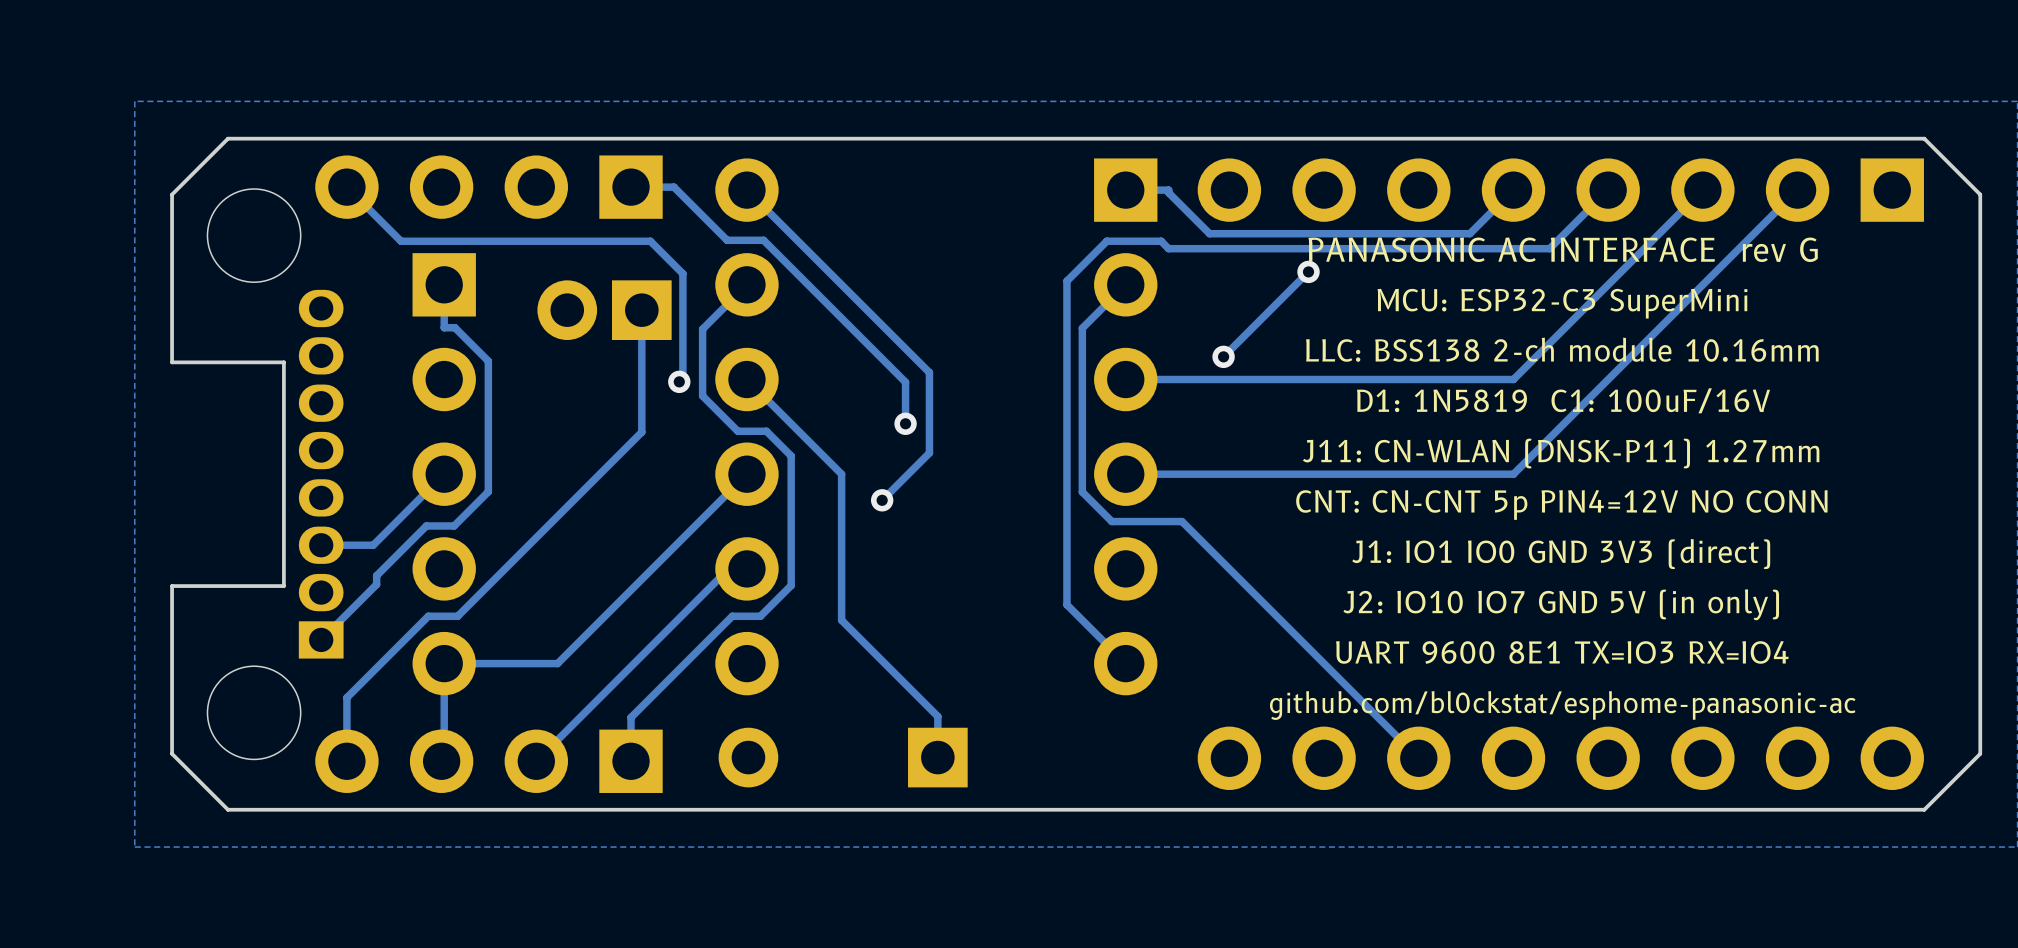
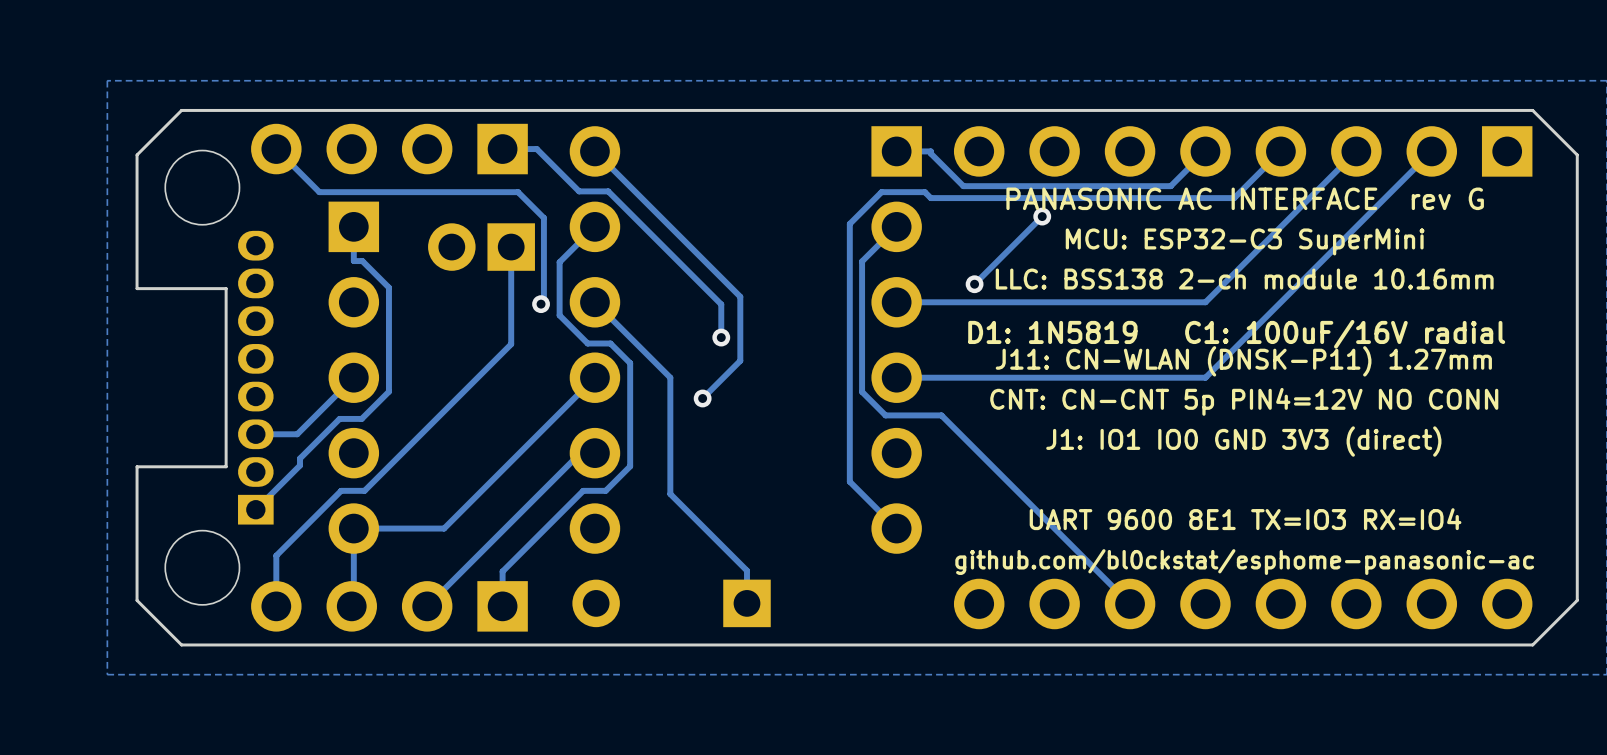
text: D1: 1N5819 C1: 100uF/16V (1563, 400) -> D1: 1N5819 C1: 100uF/16V radial (1236, 334)
text: J2: IO10 IO7 GND 5V (in only) (1561, 604) -> none

